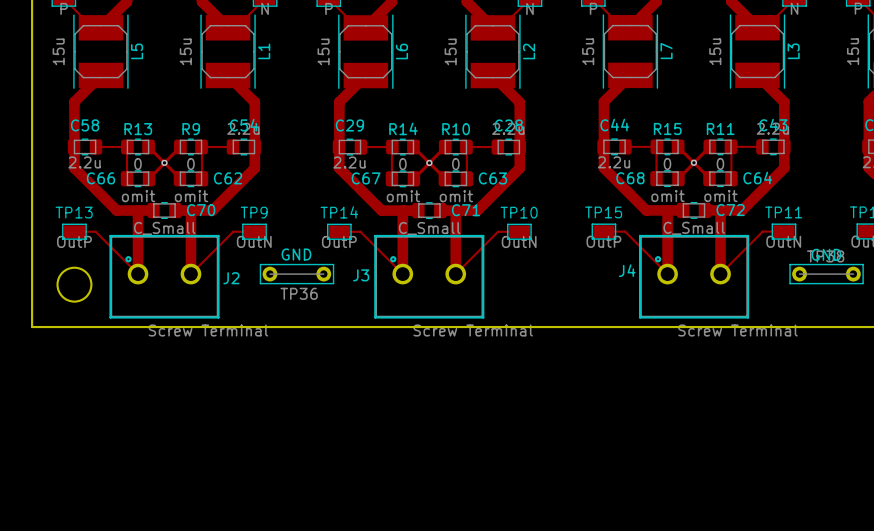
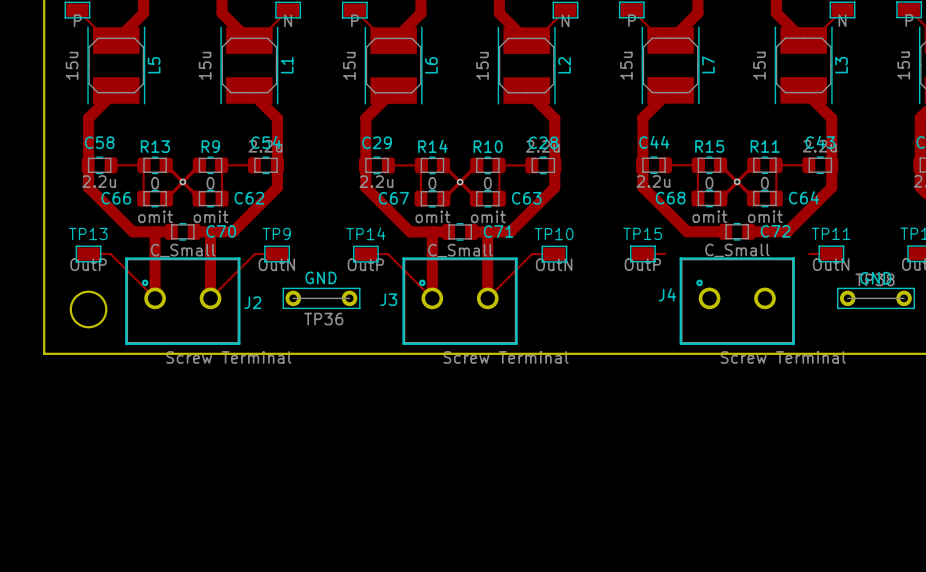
top track: (668, 210) (667, 274) (625, 231) -> none
top track: (720, 210) (720, 274) -> none
top track: (762, 231) (720, 273) -> none

